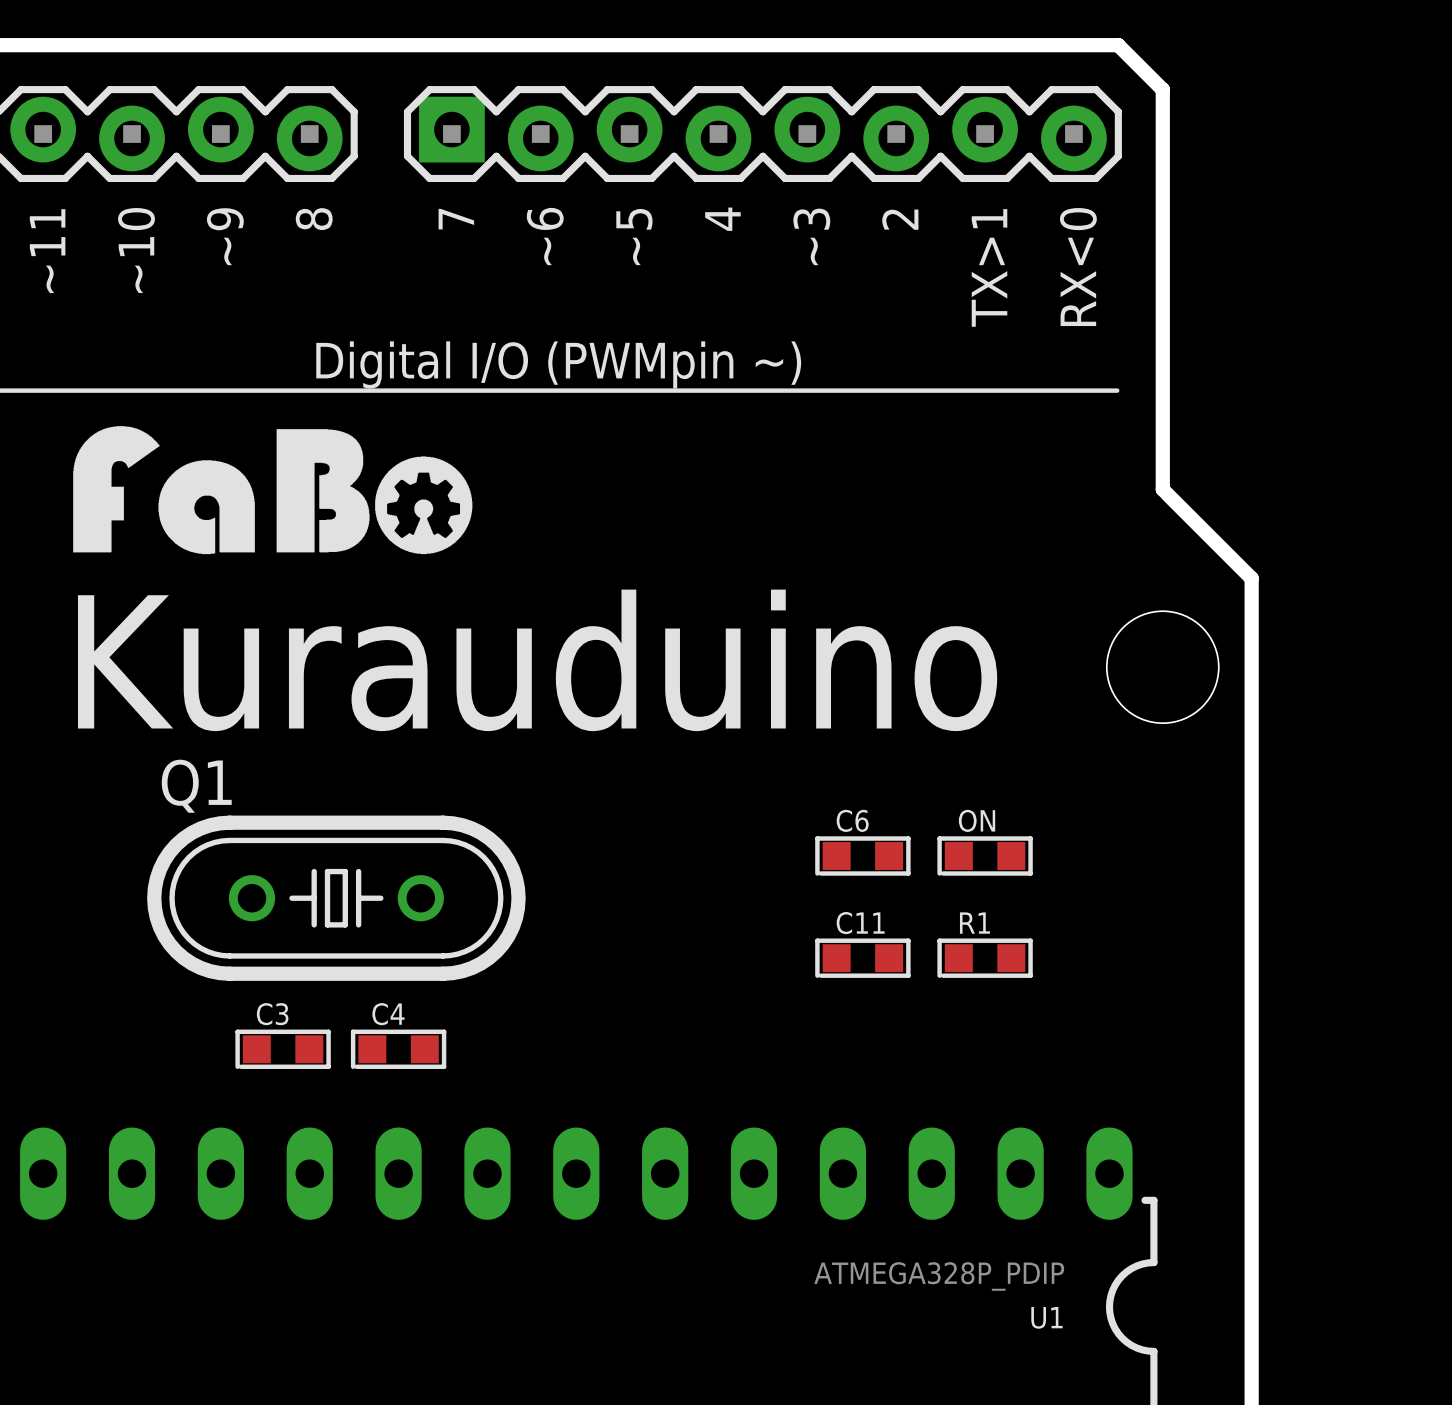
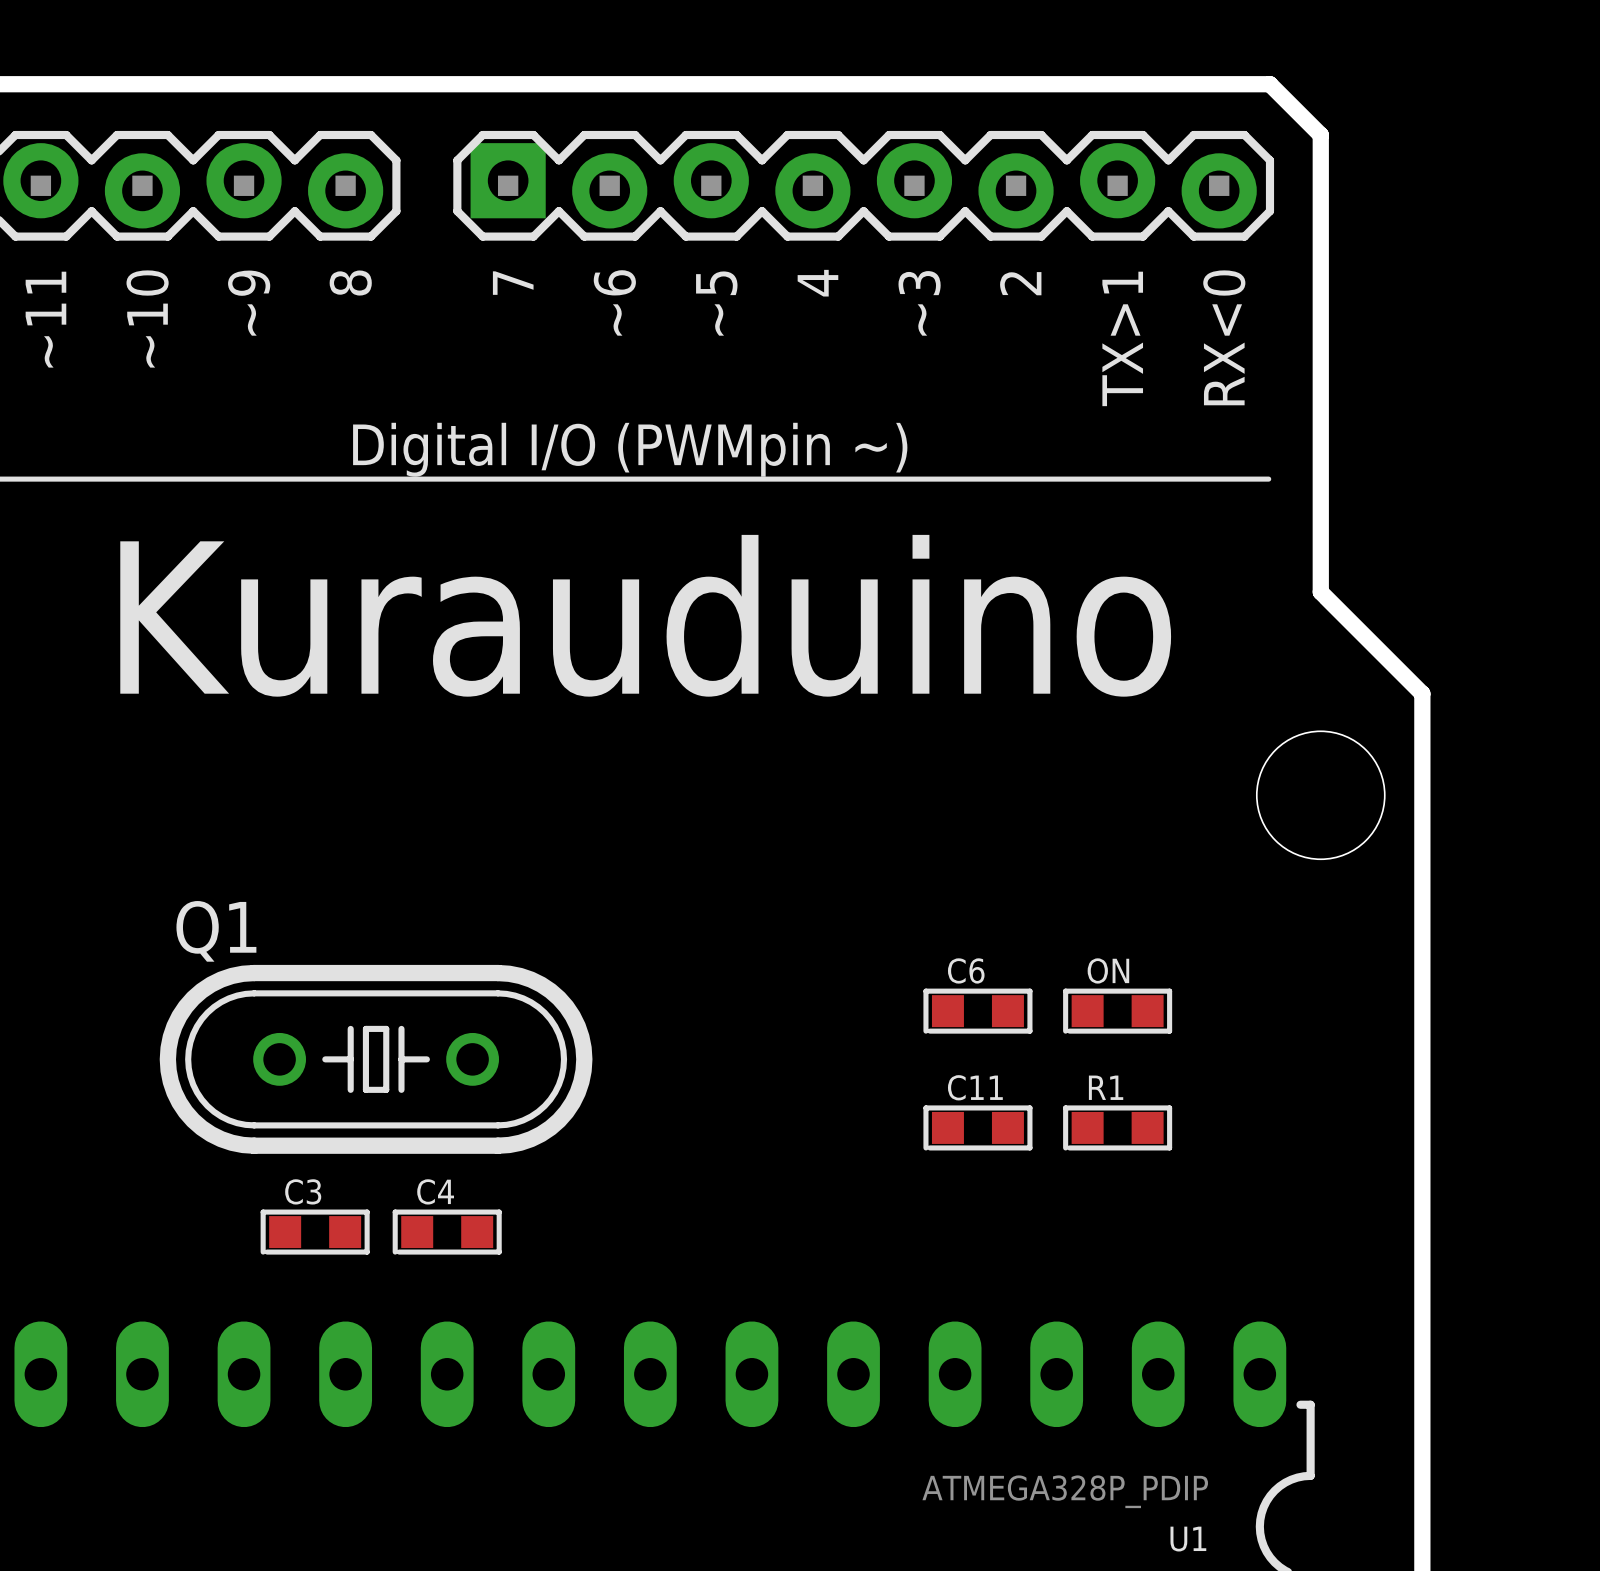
drawing: [73, 426, 473, 555] -> none
text position: Kurauduino (537, 660) -> Kurauduino (645, 615)

